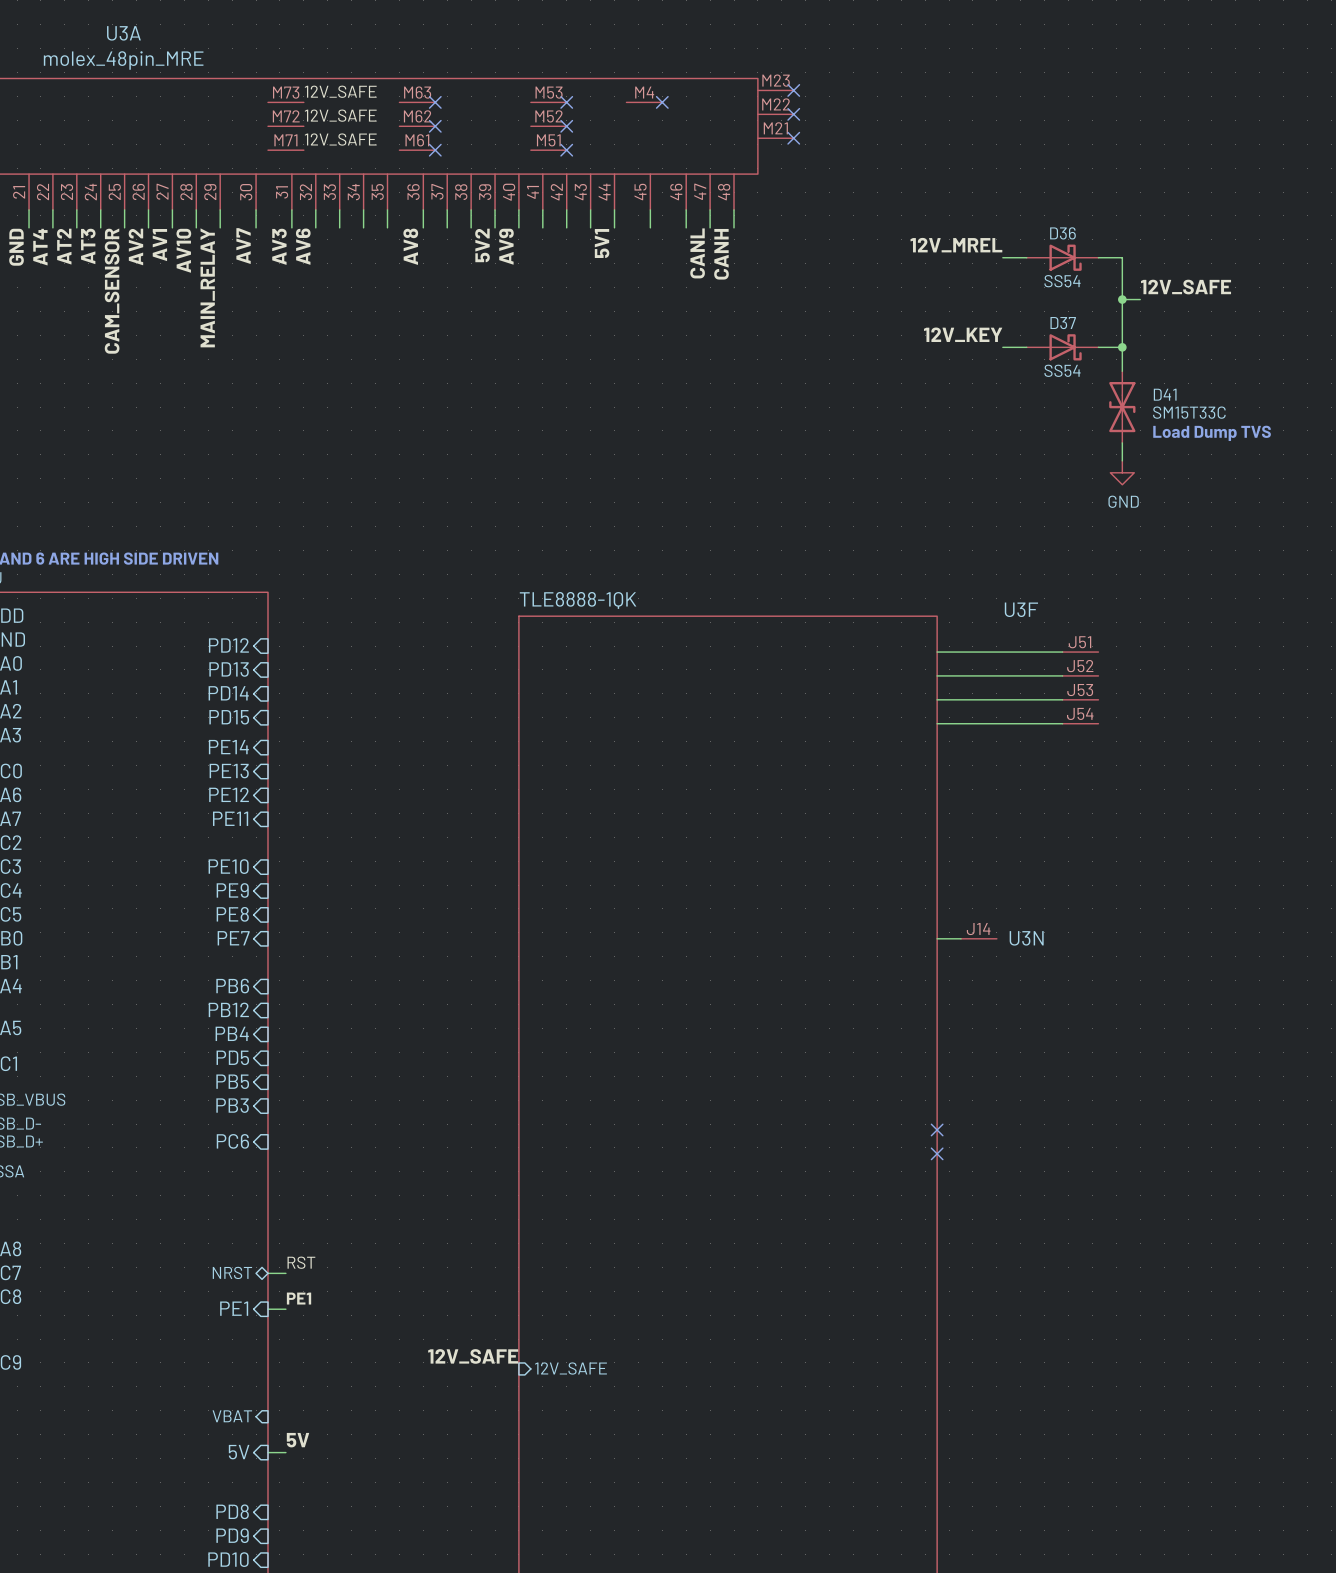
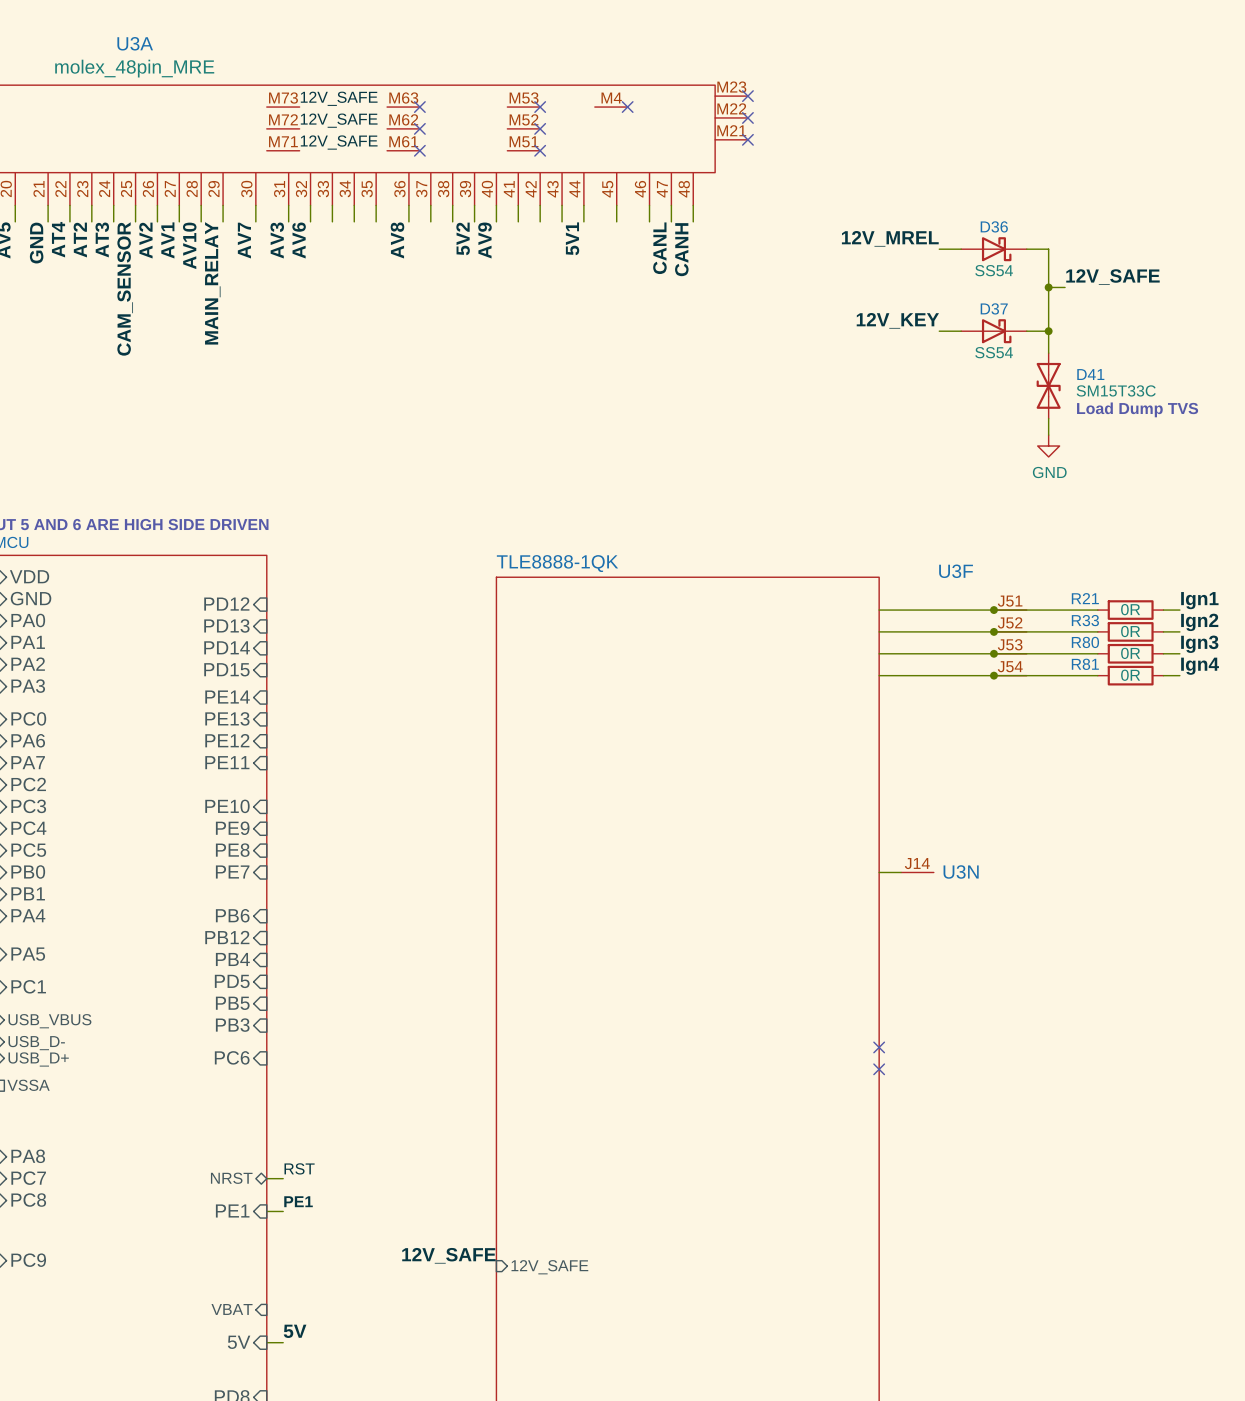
label: none -> Ign1 (1199, 600)
wire: none -> (993, 610) (1097, 610)
junction: none -> (993, 610)
R21: none -> 0R (1130, 610)
wire: none -> (1163, 610) (1179, 610)
label: none -> Ign2 (1199, 622)
wire: none -> (993, 631) (1097, 631)
junction: none -> (993, 631)
R33: none -> 0R (1130, 631)
wire: none -> (1163, 631) (1179, 631)
label: none -> Ign3 (1199, 644)
wire: none -> (993, 653) (1097, 653)
junction: none -> (993, 653)
R80: none -> 0R (1130, 653)
wire: none -> (1163, 653) (1179, 653)
label: none -> Ign4 (1200, 666)
wire: none -> (993, 675) (1097, 675)
junction: none -> (993, 675)
R81: none -> 0R (1130, 675)
wire: none -> (1163, 675) (1179, 675)

